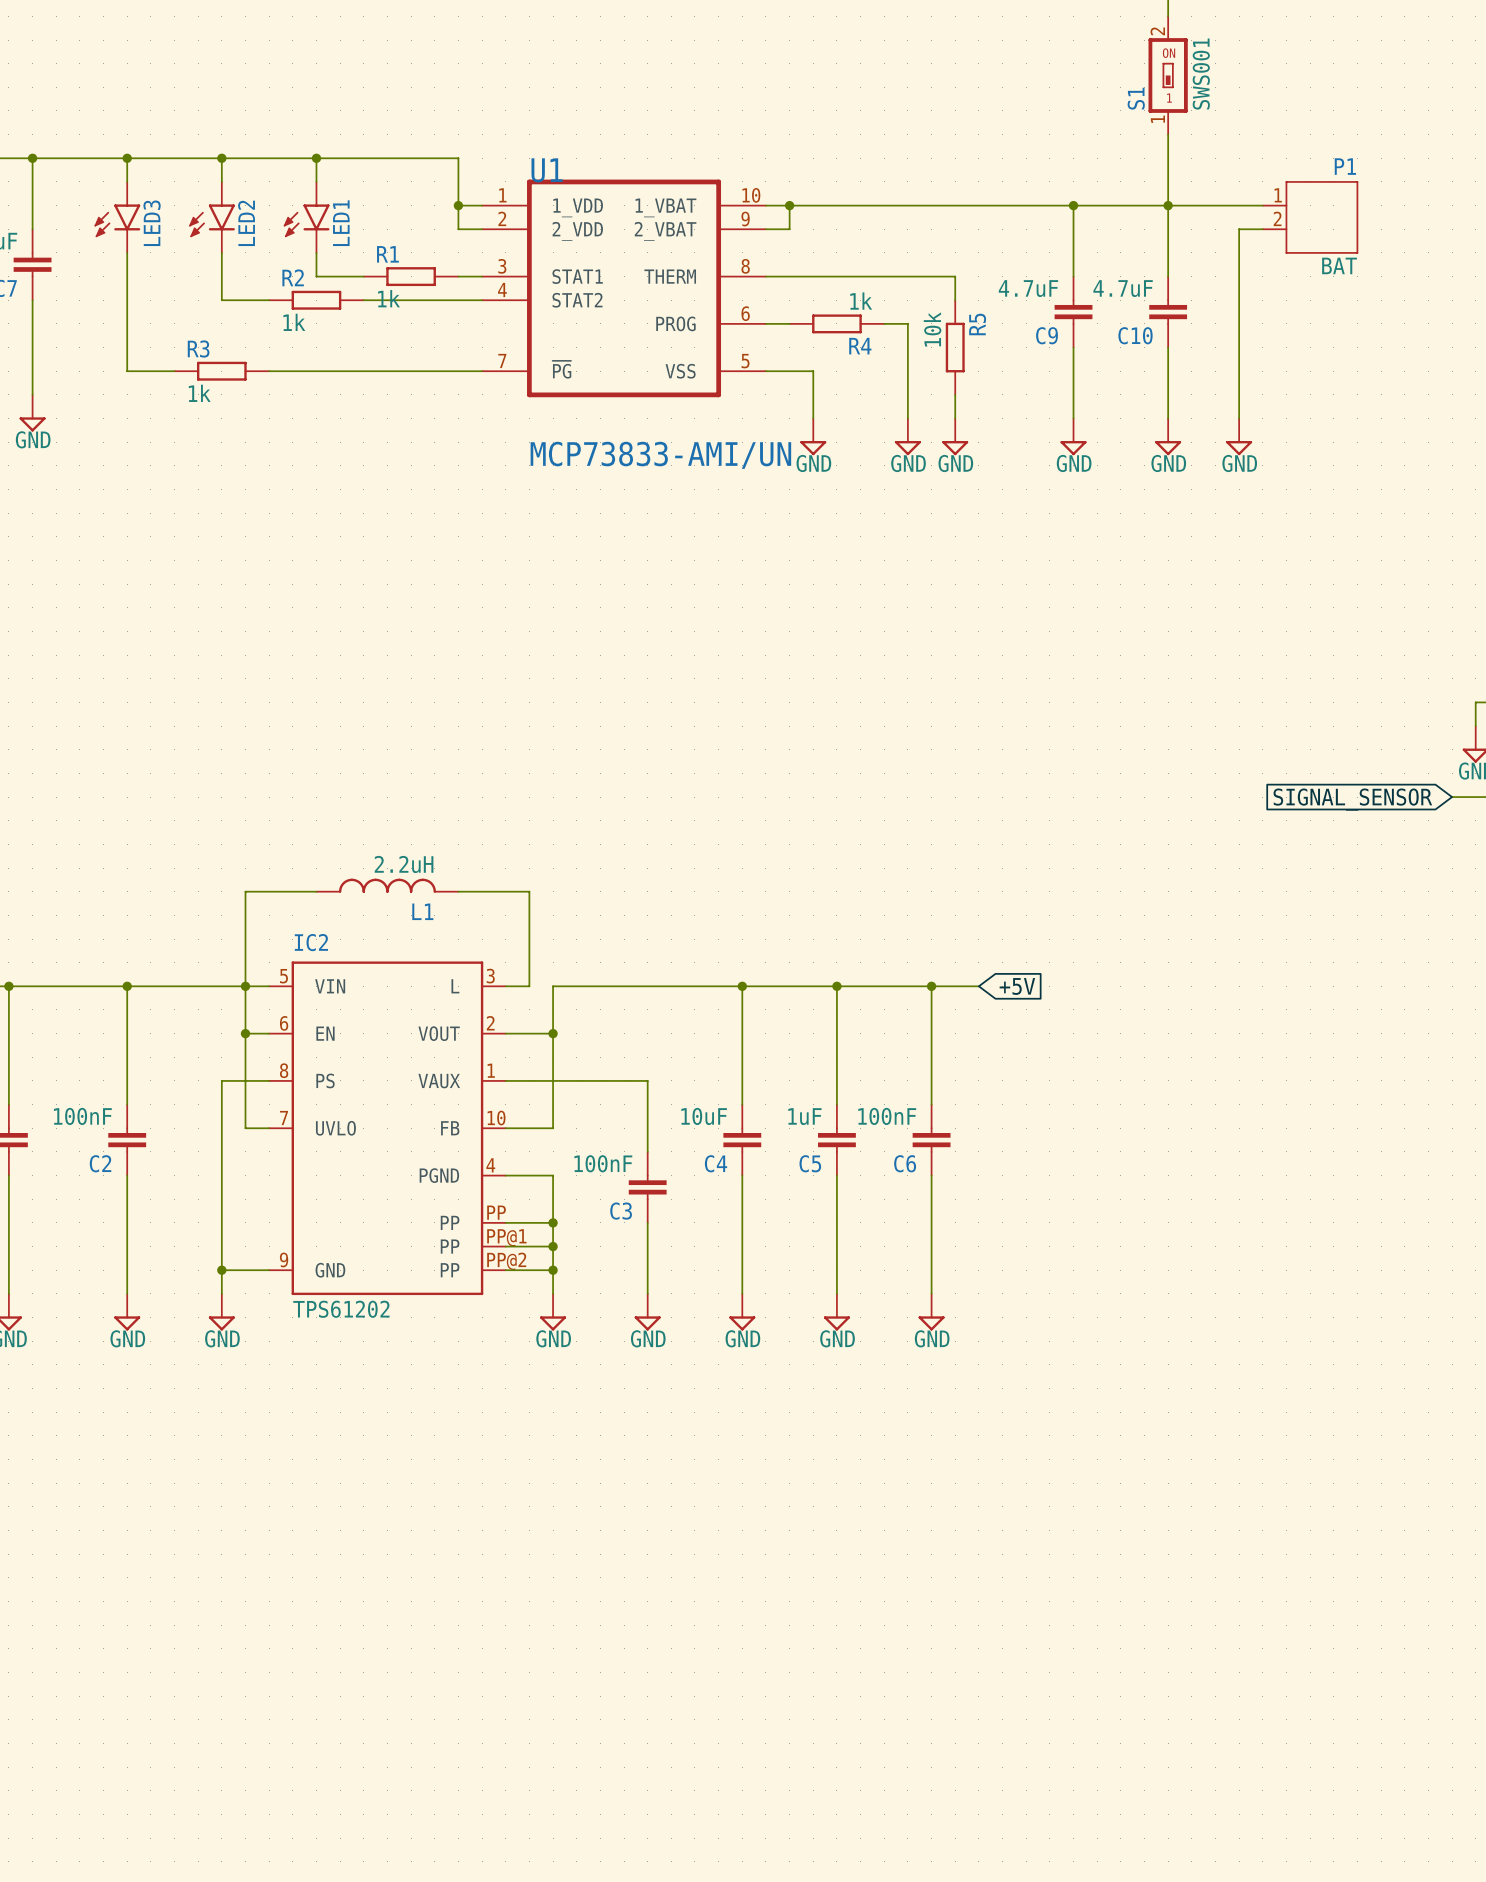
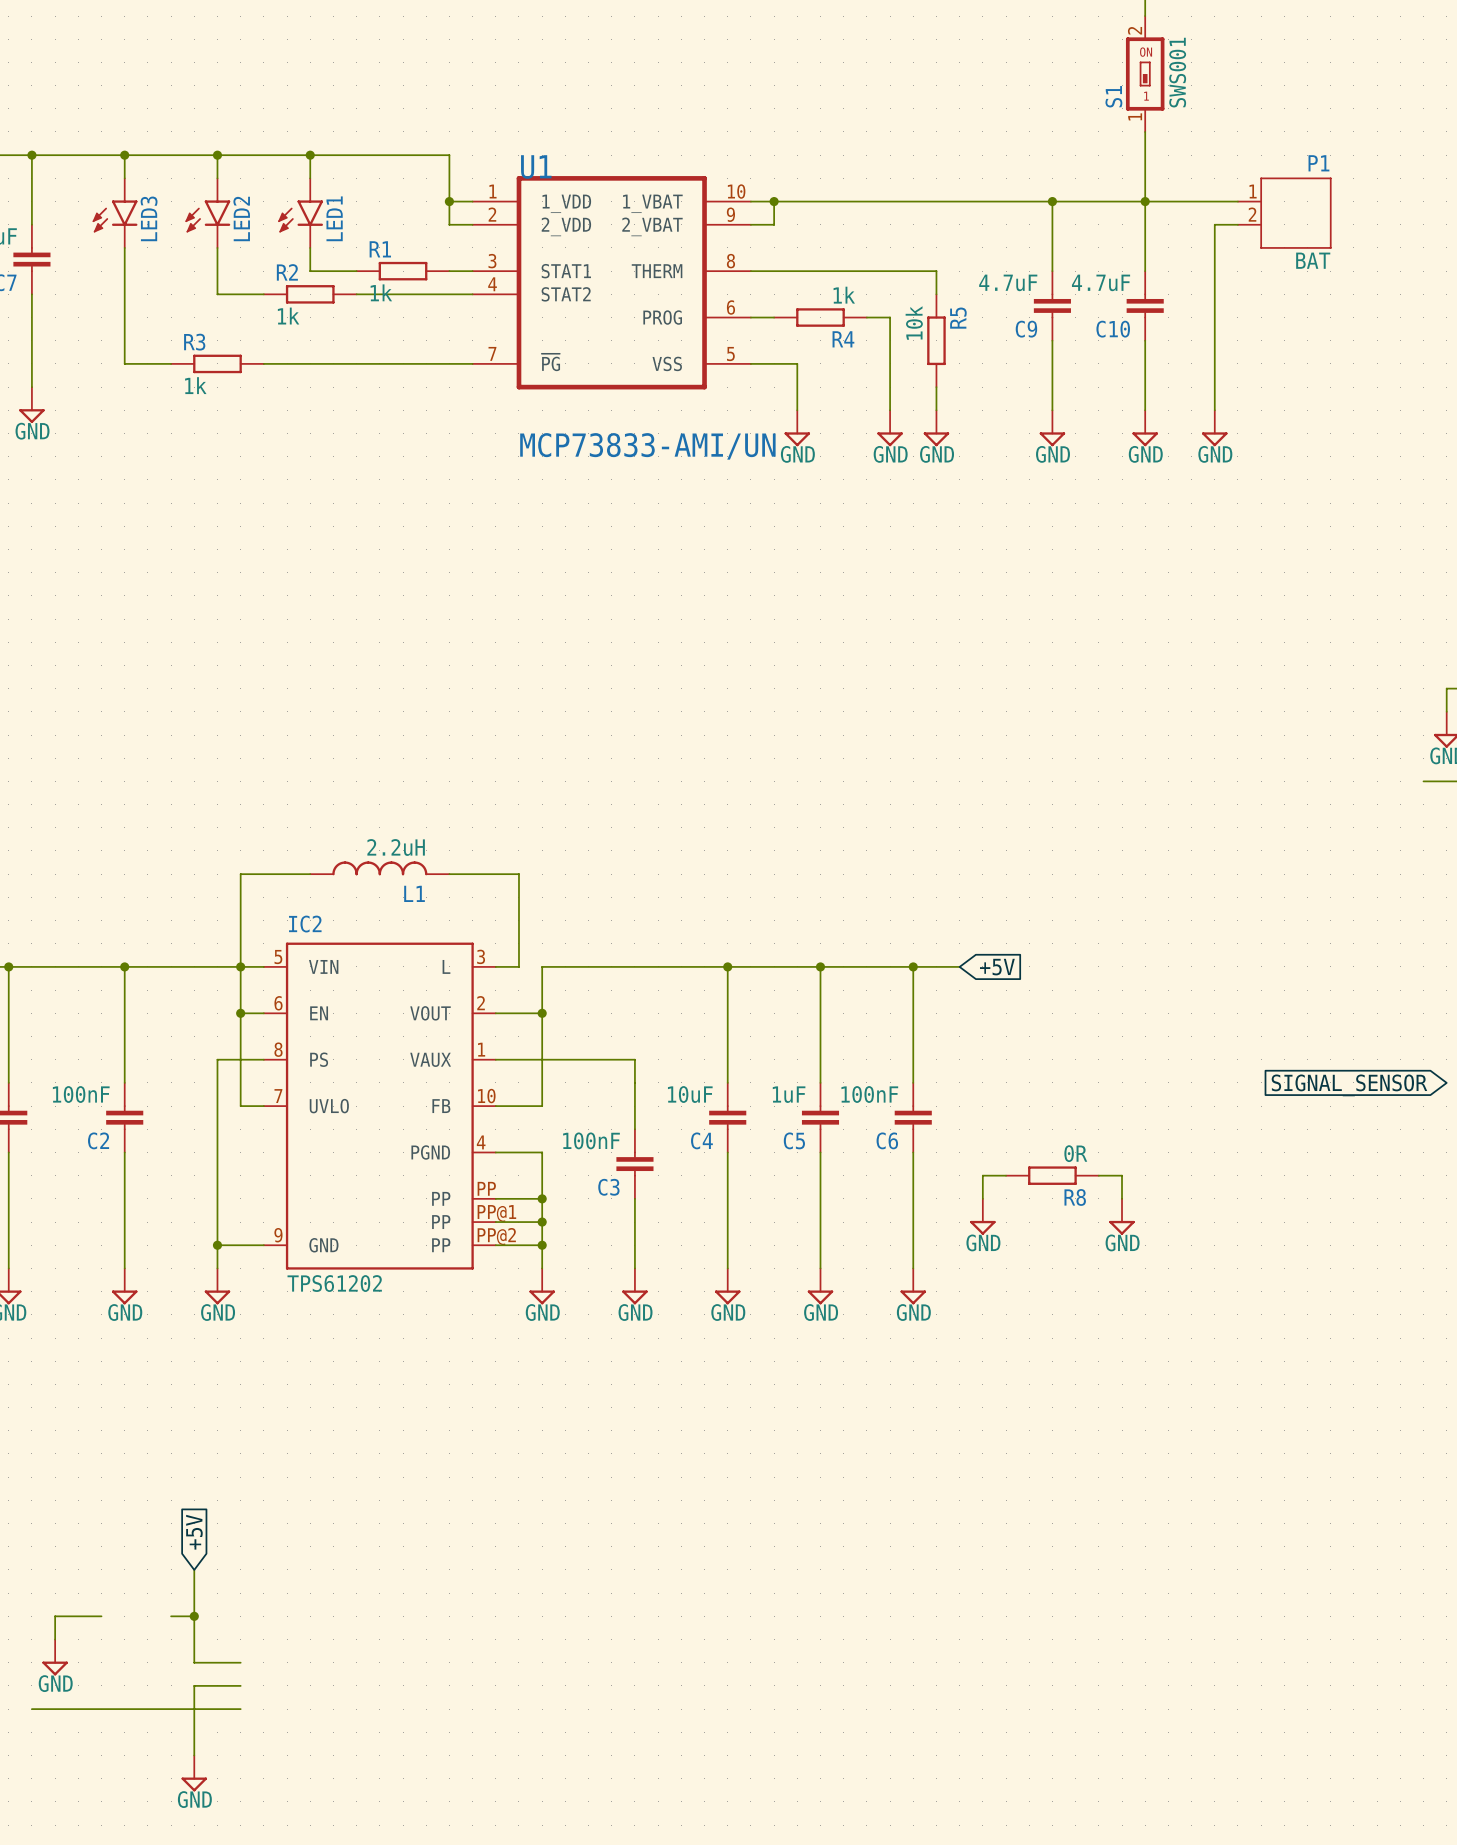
global label: SIGNAL_SENSOR (1352, 799) -> none
global label: none -> SIGNAL_SENSOR (1349, 1085)
wire: none -> (1006, 1175) (982, 1175) (982, 1198)
R8: none -> 0R (1052, 1175)
wire: none -> (1098, 1175) (1122, 1175) (1122, 1198)
power symbol: none -> GND (982, 1216)
power symbol: none -> GND (1122, 1216)
global label: none -> +5V (194, 1532)
wire: none -> (194, 1569) (194, 1662) (240, 1662)
wire: none -> (101, 1616) (55, 1616) (55, 1639)
wire: none -> (171, 1616) (194, 1616)
junction: none -> (194, 1616)
power symbol: none -> GND (55, 1657)
wire: none -> (240, 1685) (194, 1685) (194, 1755)
wire: none -> (31, 1709) (240, 1709)
power symbol: none -> GND (194, 1773)

